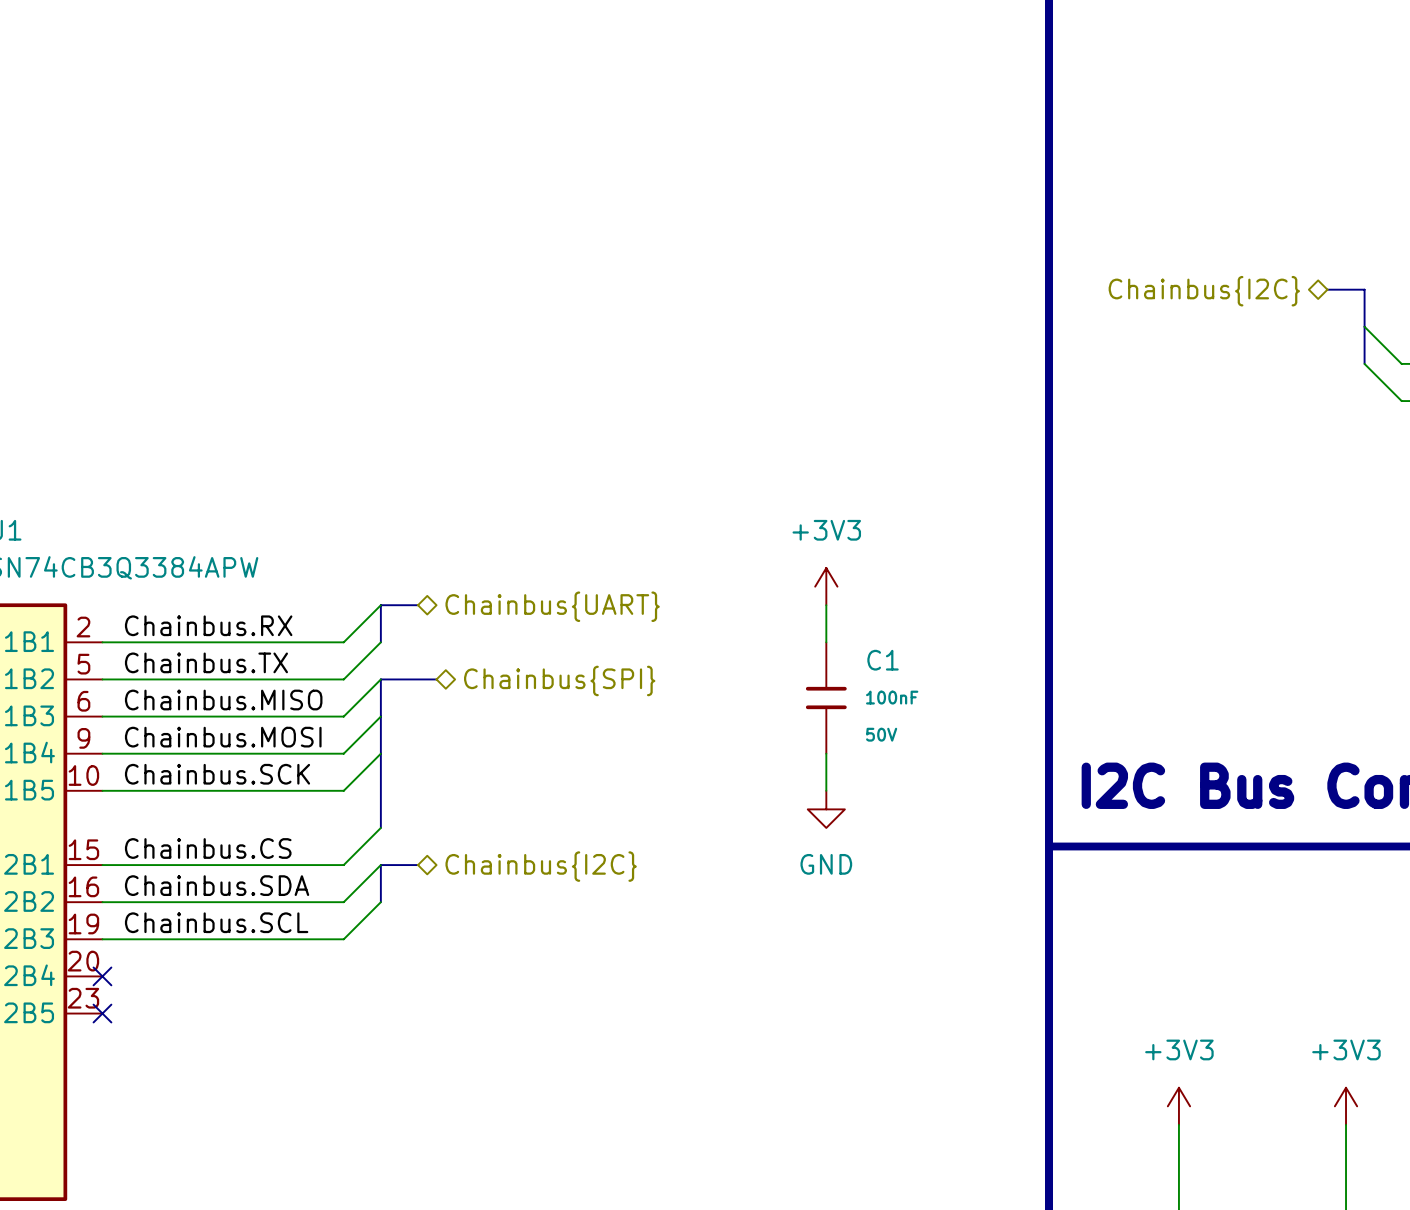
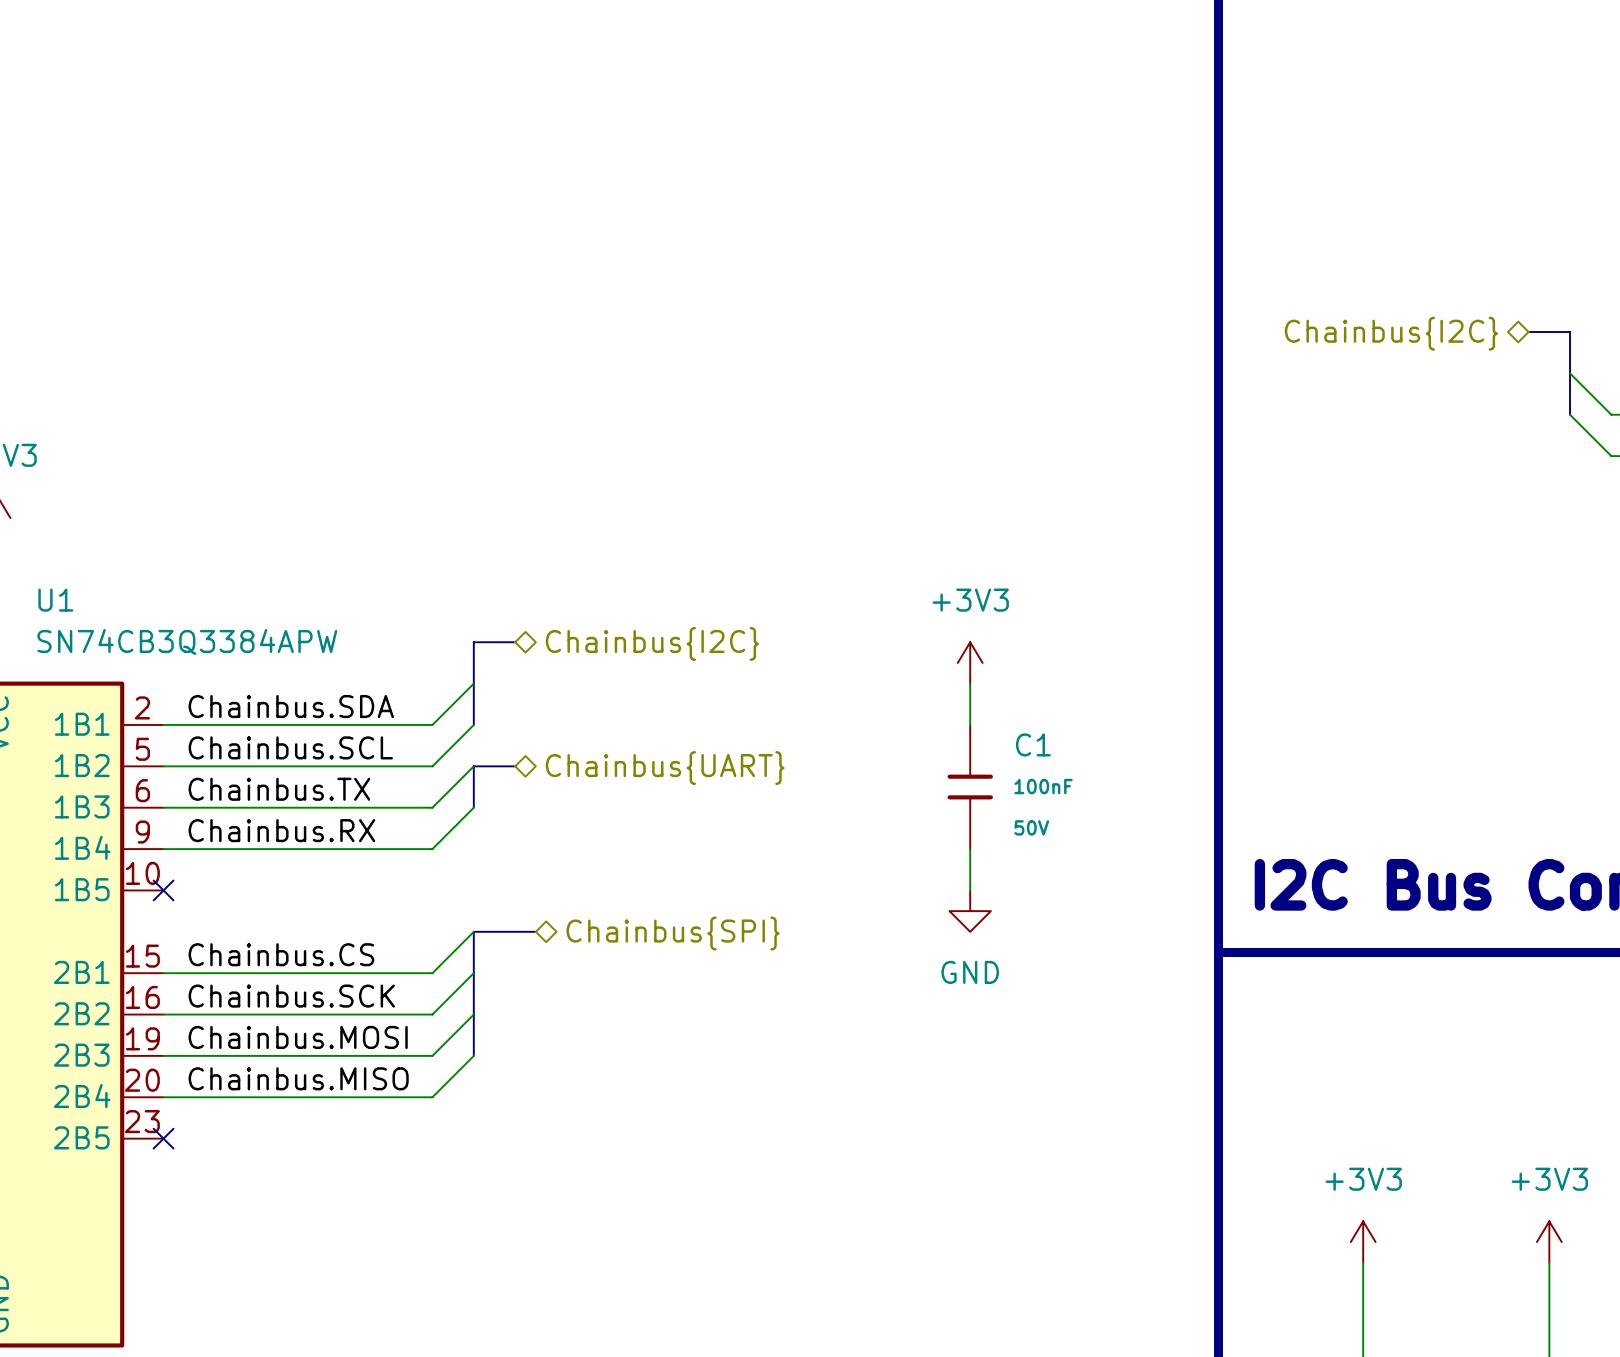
bus: (380, 605) (417, 605) -> (473, 683) (473, 642) (515, 642)
hierarchical label position: Chainbus{UART} (552, 606) -> Chainbus{UART} (665, 768)
label: Chainbus.RX (208, 625) -> Chainbus.SDA (291, 706)
label: Chainbus.TX (206, 662) -> Chainbus.SCL (290, 747)
bus: (417, 679) (436, 679) -> none
hierarchical label position: Chainbus{SPI} (559, 680) -> Chainbus{SPI} (673, 933)
label: Chainbus.MISO (223, 700) -> Chainbus.TX (279, 789)
bus: (380, 716) (380, 827) -> none
label: Chainbus.MOSI (223, 737) -> Chainbus.RX (281, 830)
wire: (380, 753) (343, 790) (102, 790) -> (473, 1055) (432, 1097) (163, 1097)
label: Chainbus.SCK (217, 774) -> none
no-connect mark: none -> (163, 890)
bus: (380, 865) (417, 865) -> (473, 973) (473, 931) (535, 931)
hierarchical label position: Chainbus{I2C} (541, 866) -> Chainbus{I2C} (652, 643)
label: Chainbus.SDA (217, 885) -> Chainbus.SCK (291, 996)
bus: none -> (473, 1014) (473, 1055)
label: Chainbus.SCL (216, 922) -> Chainbus.MOSI (298, 1037)
label: none -> Chainbus.MISO (298, 1078)
no-connect mark: (102, 976) -> none

